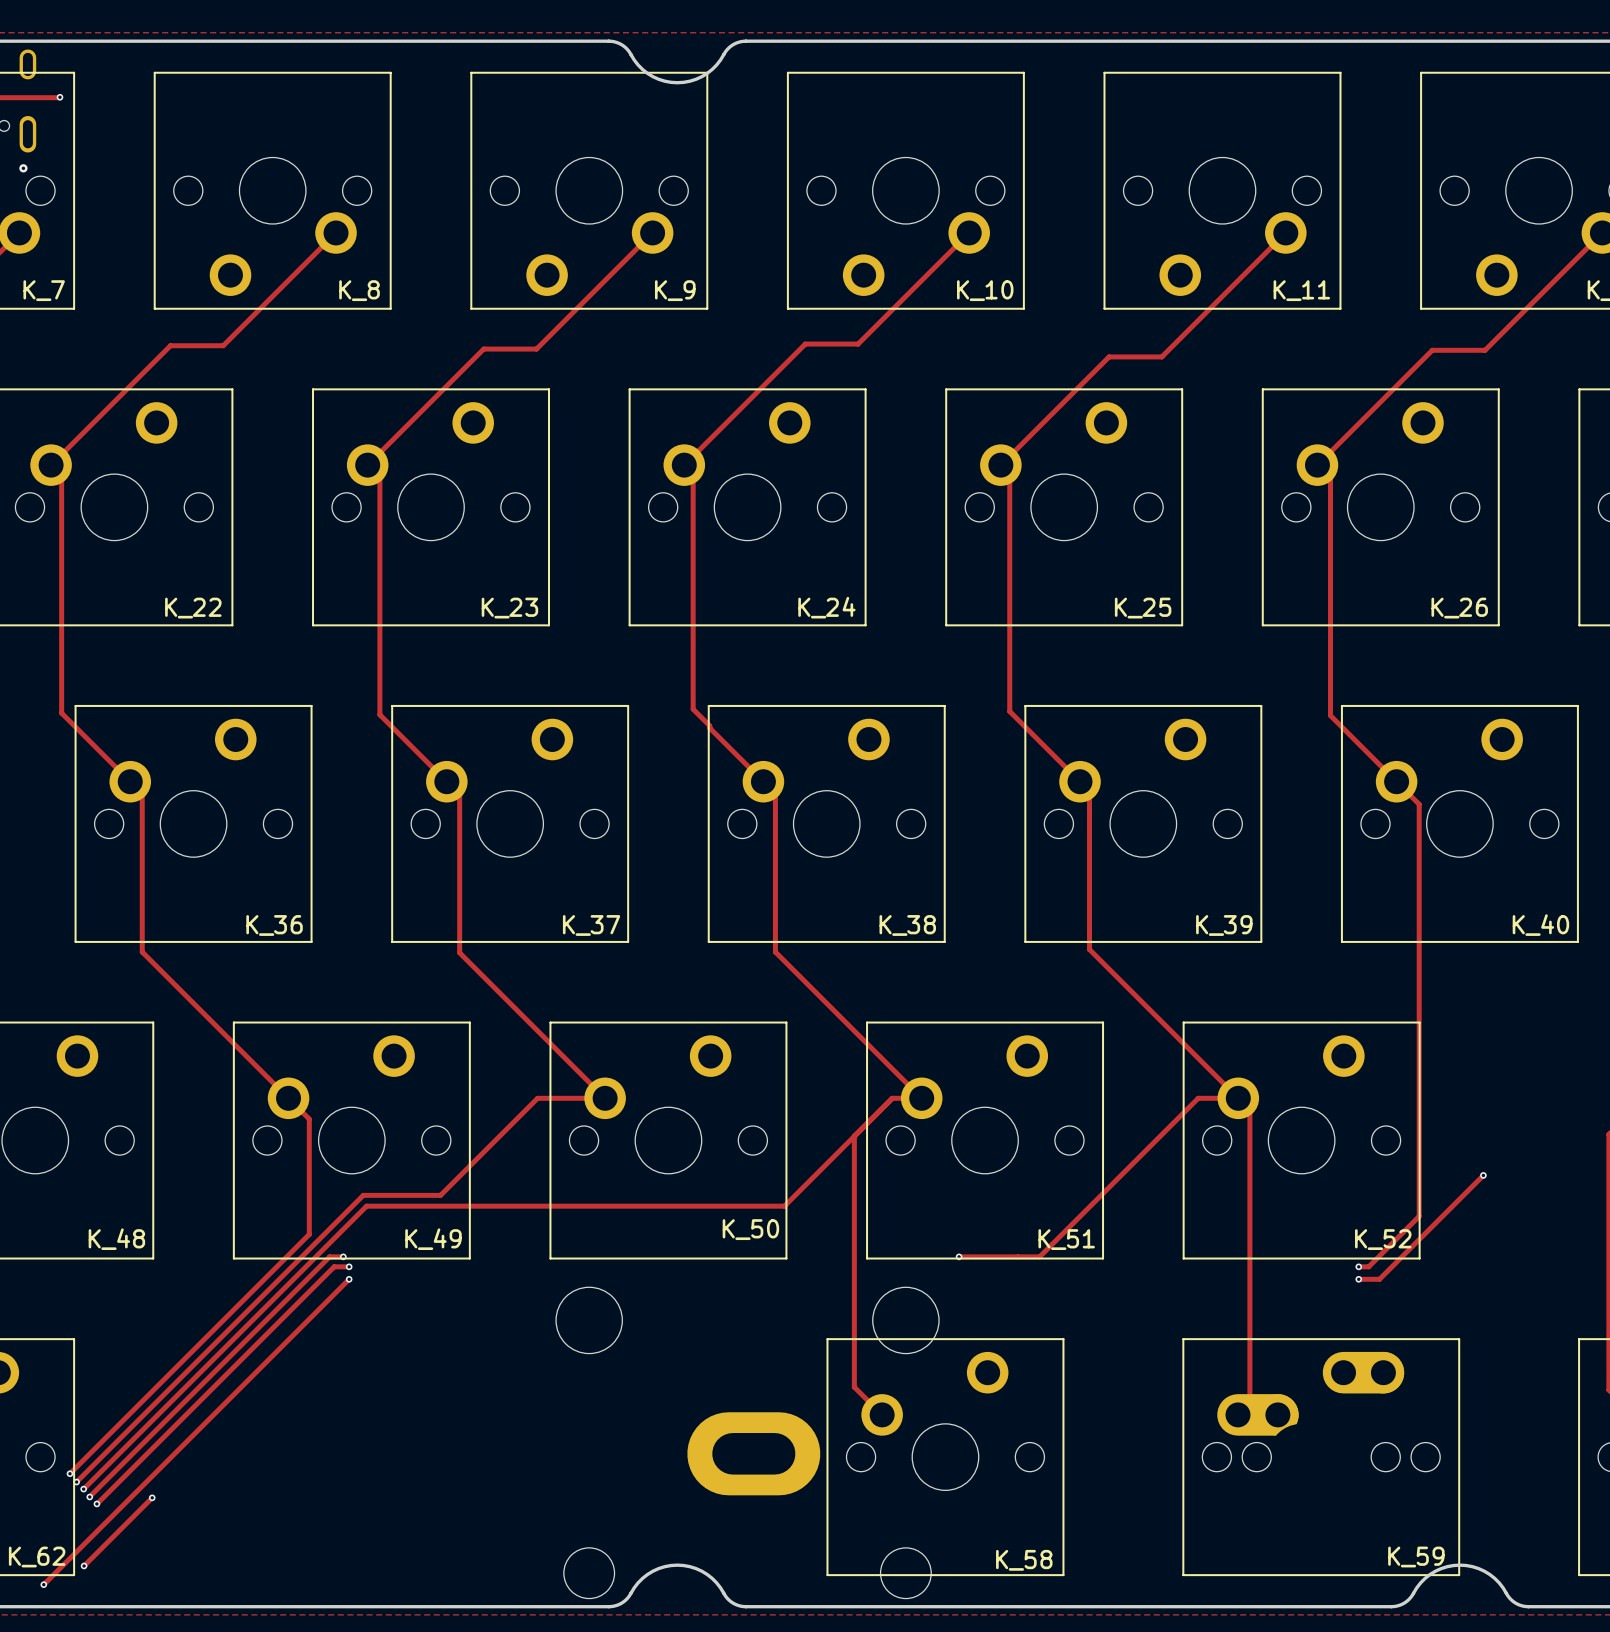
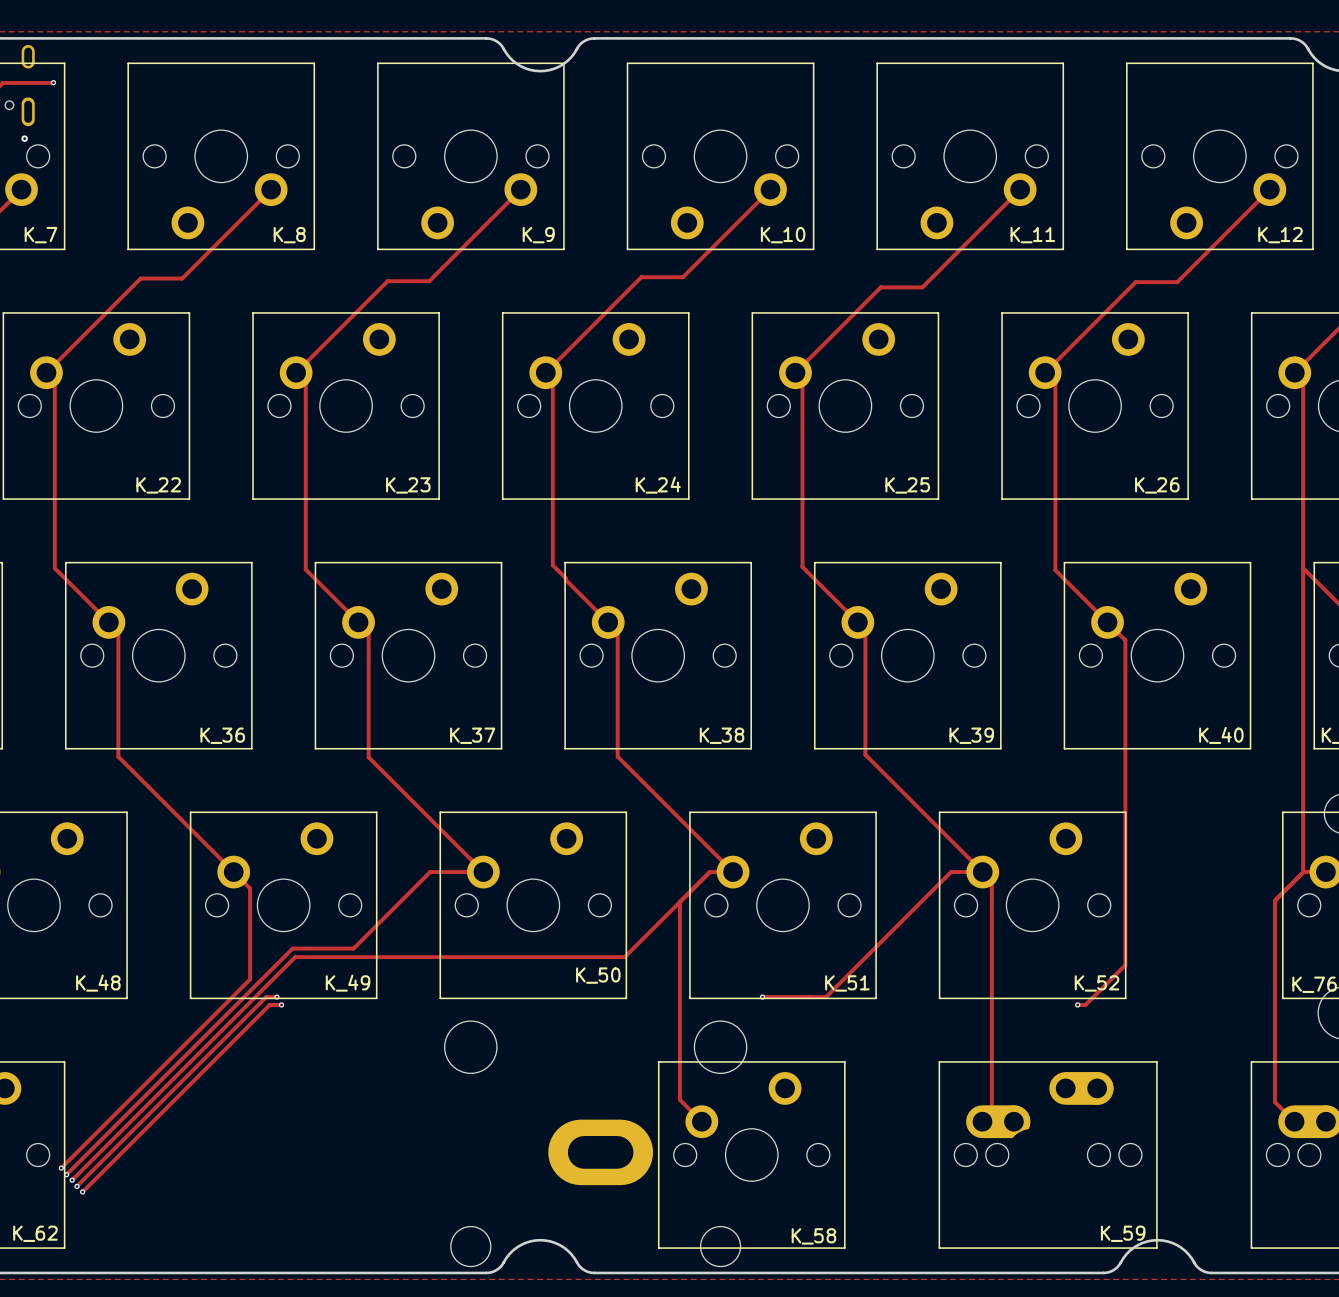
track: (1483, 1175) (1379, 1279) (1358, 1279) -> none
via: (1483, 1175) -> none
track: (349, 1279) (43, 1584) -> none
via: (349, 1279) -> none
via: (1358, 1279) -> none
track: (152, 1497) (84, 1565) -> none
via: (152, 1497) -> none
via: (84, 1565) -> none
via: (43, 1584) -> none

